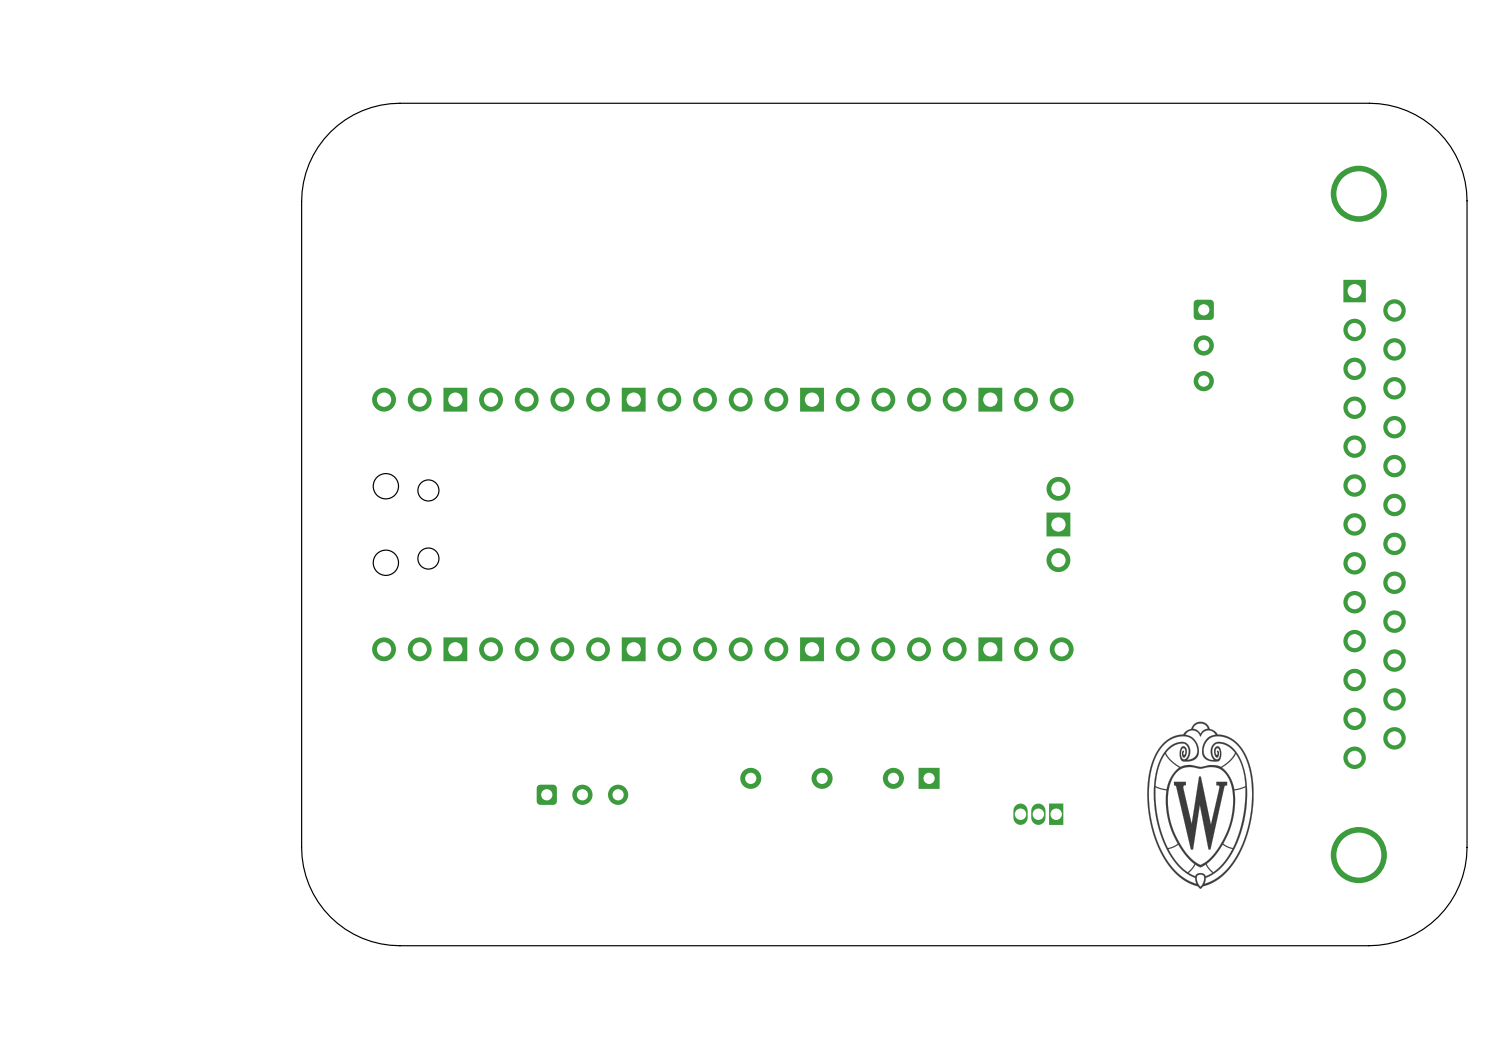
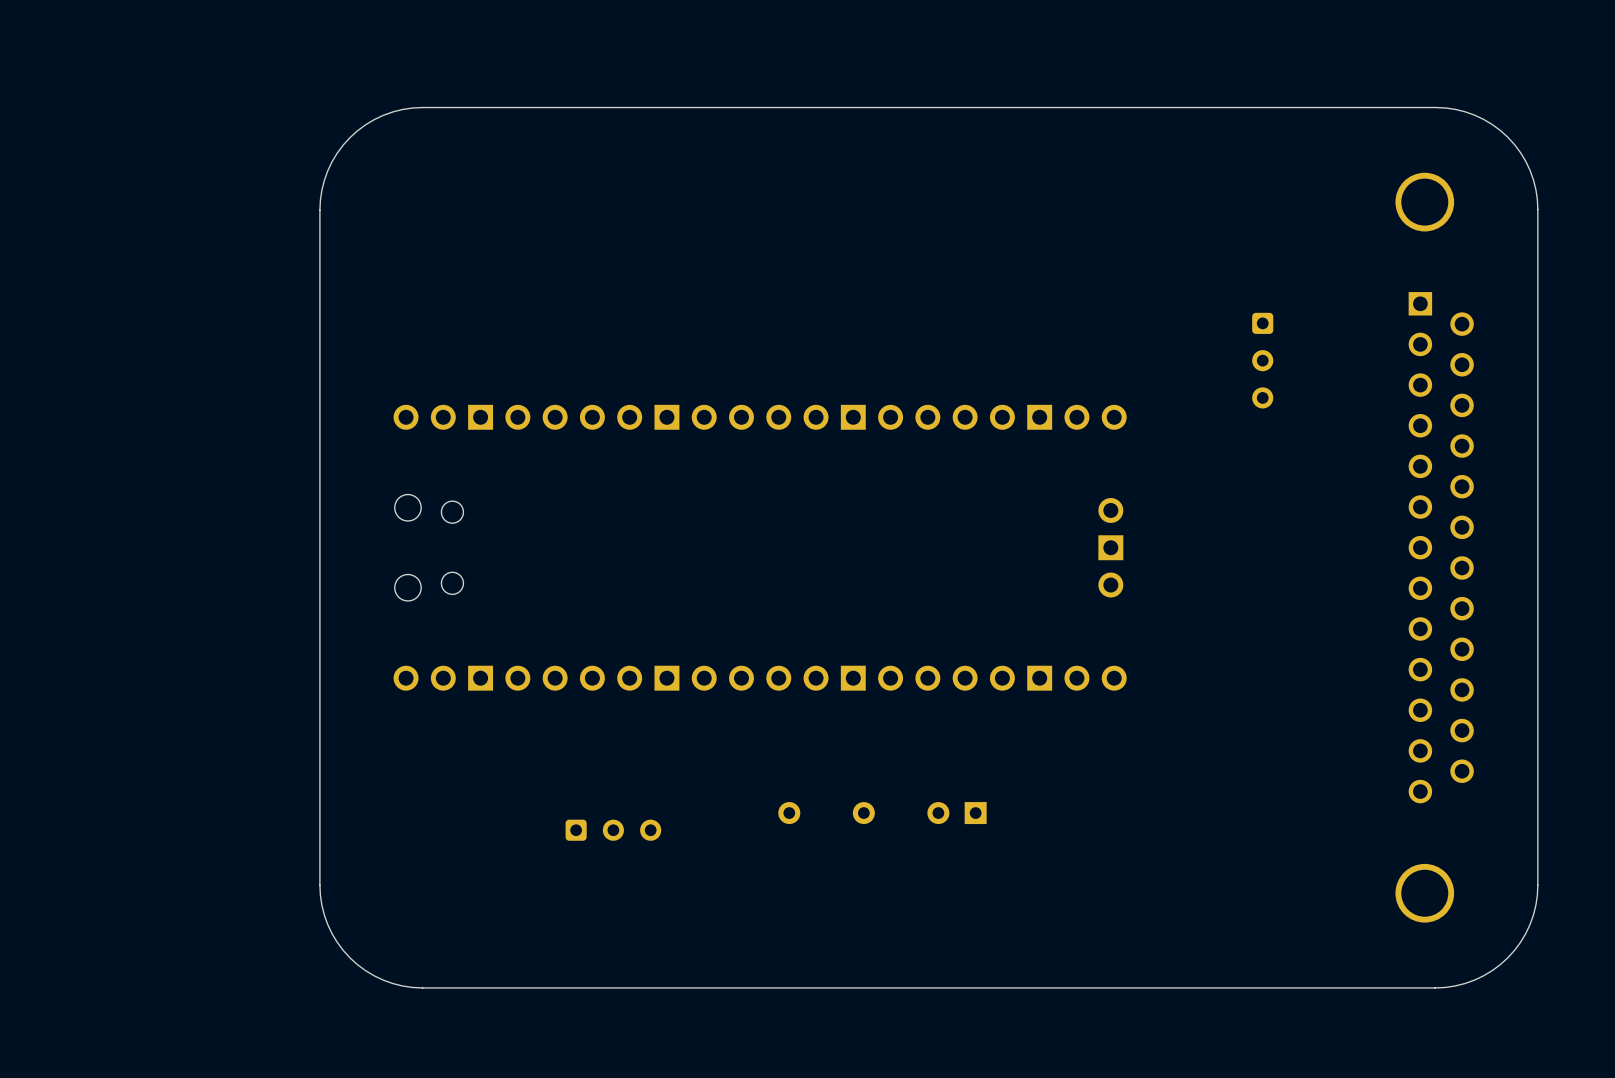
drawing: [1147, 721, 1254, 889] -> none
part: (1038, 814) -> none

